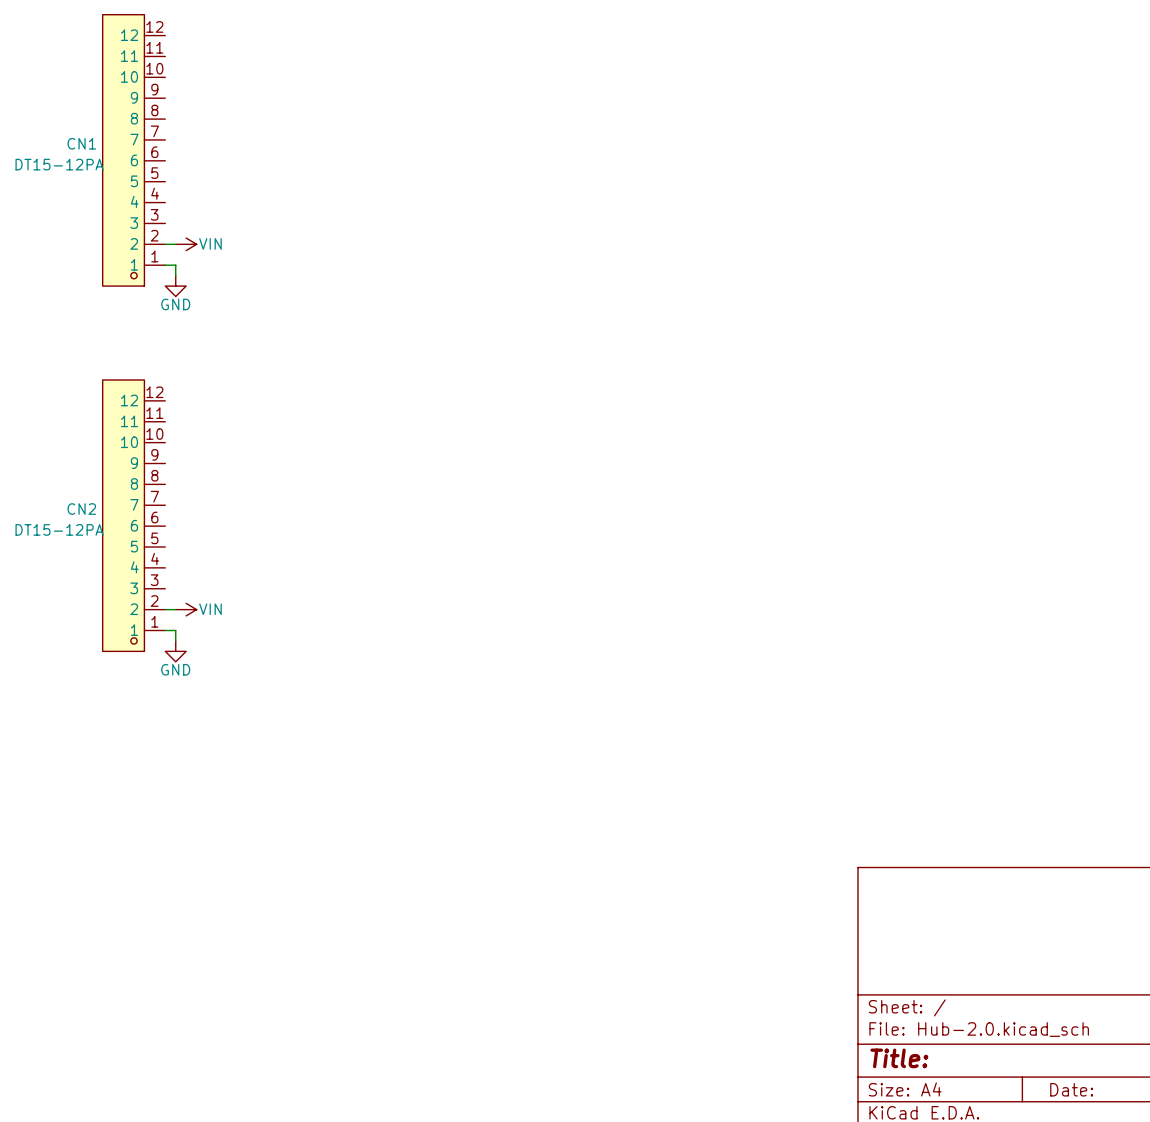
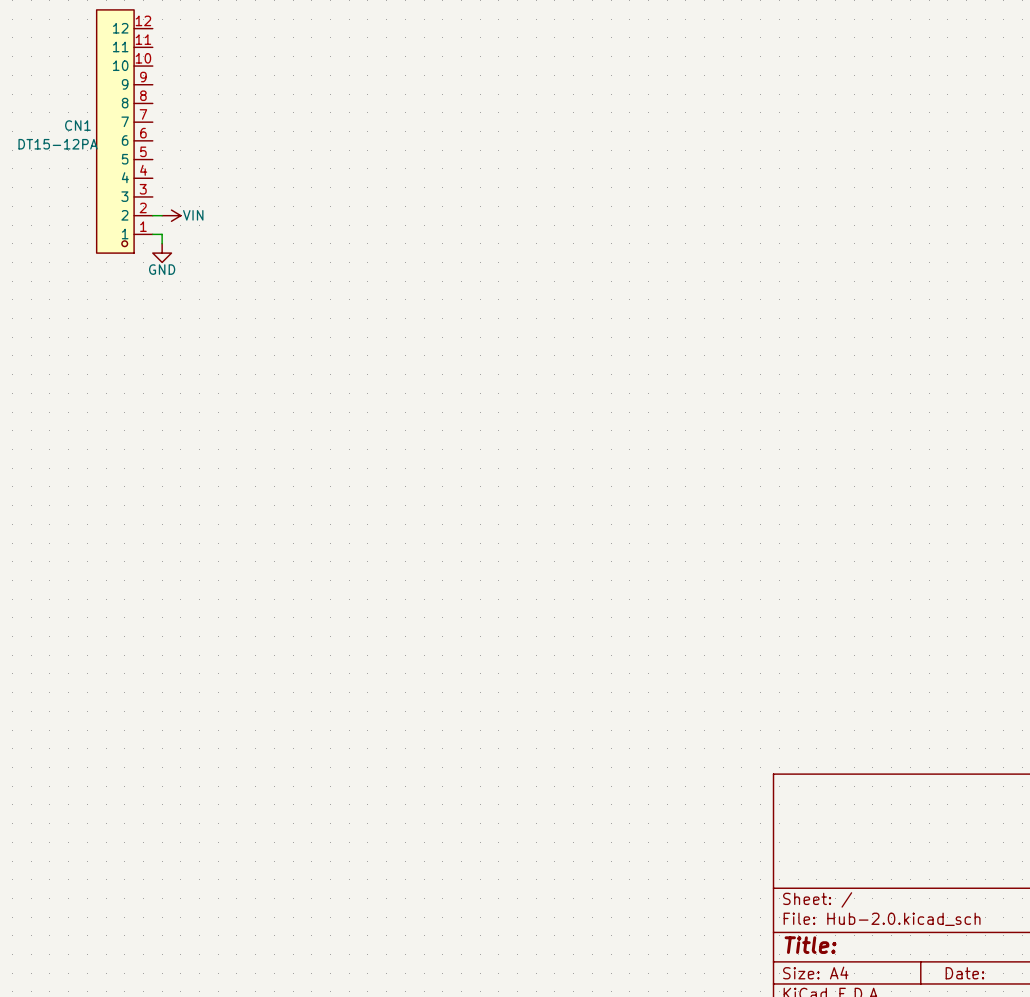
CN2: DT15-12PA (133, 515) -> none
wire: (165, 609) (175, 609) -> none
power symbol: VIN (186, 609) -> none
wire: (165, 630) (175, 630) (175, 640) -> none
power symbol: GND (175, 651) -> none

